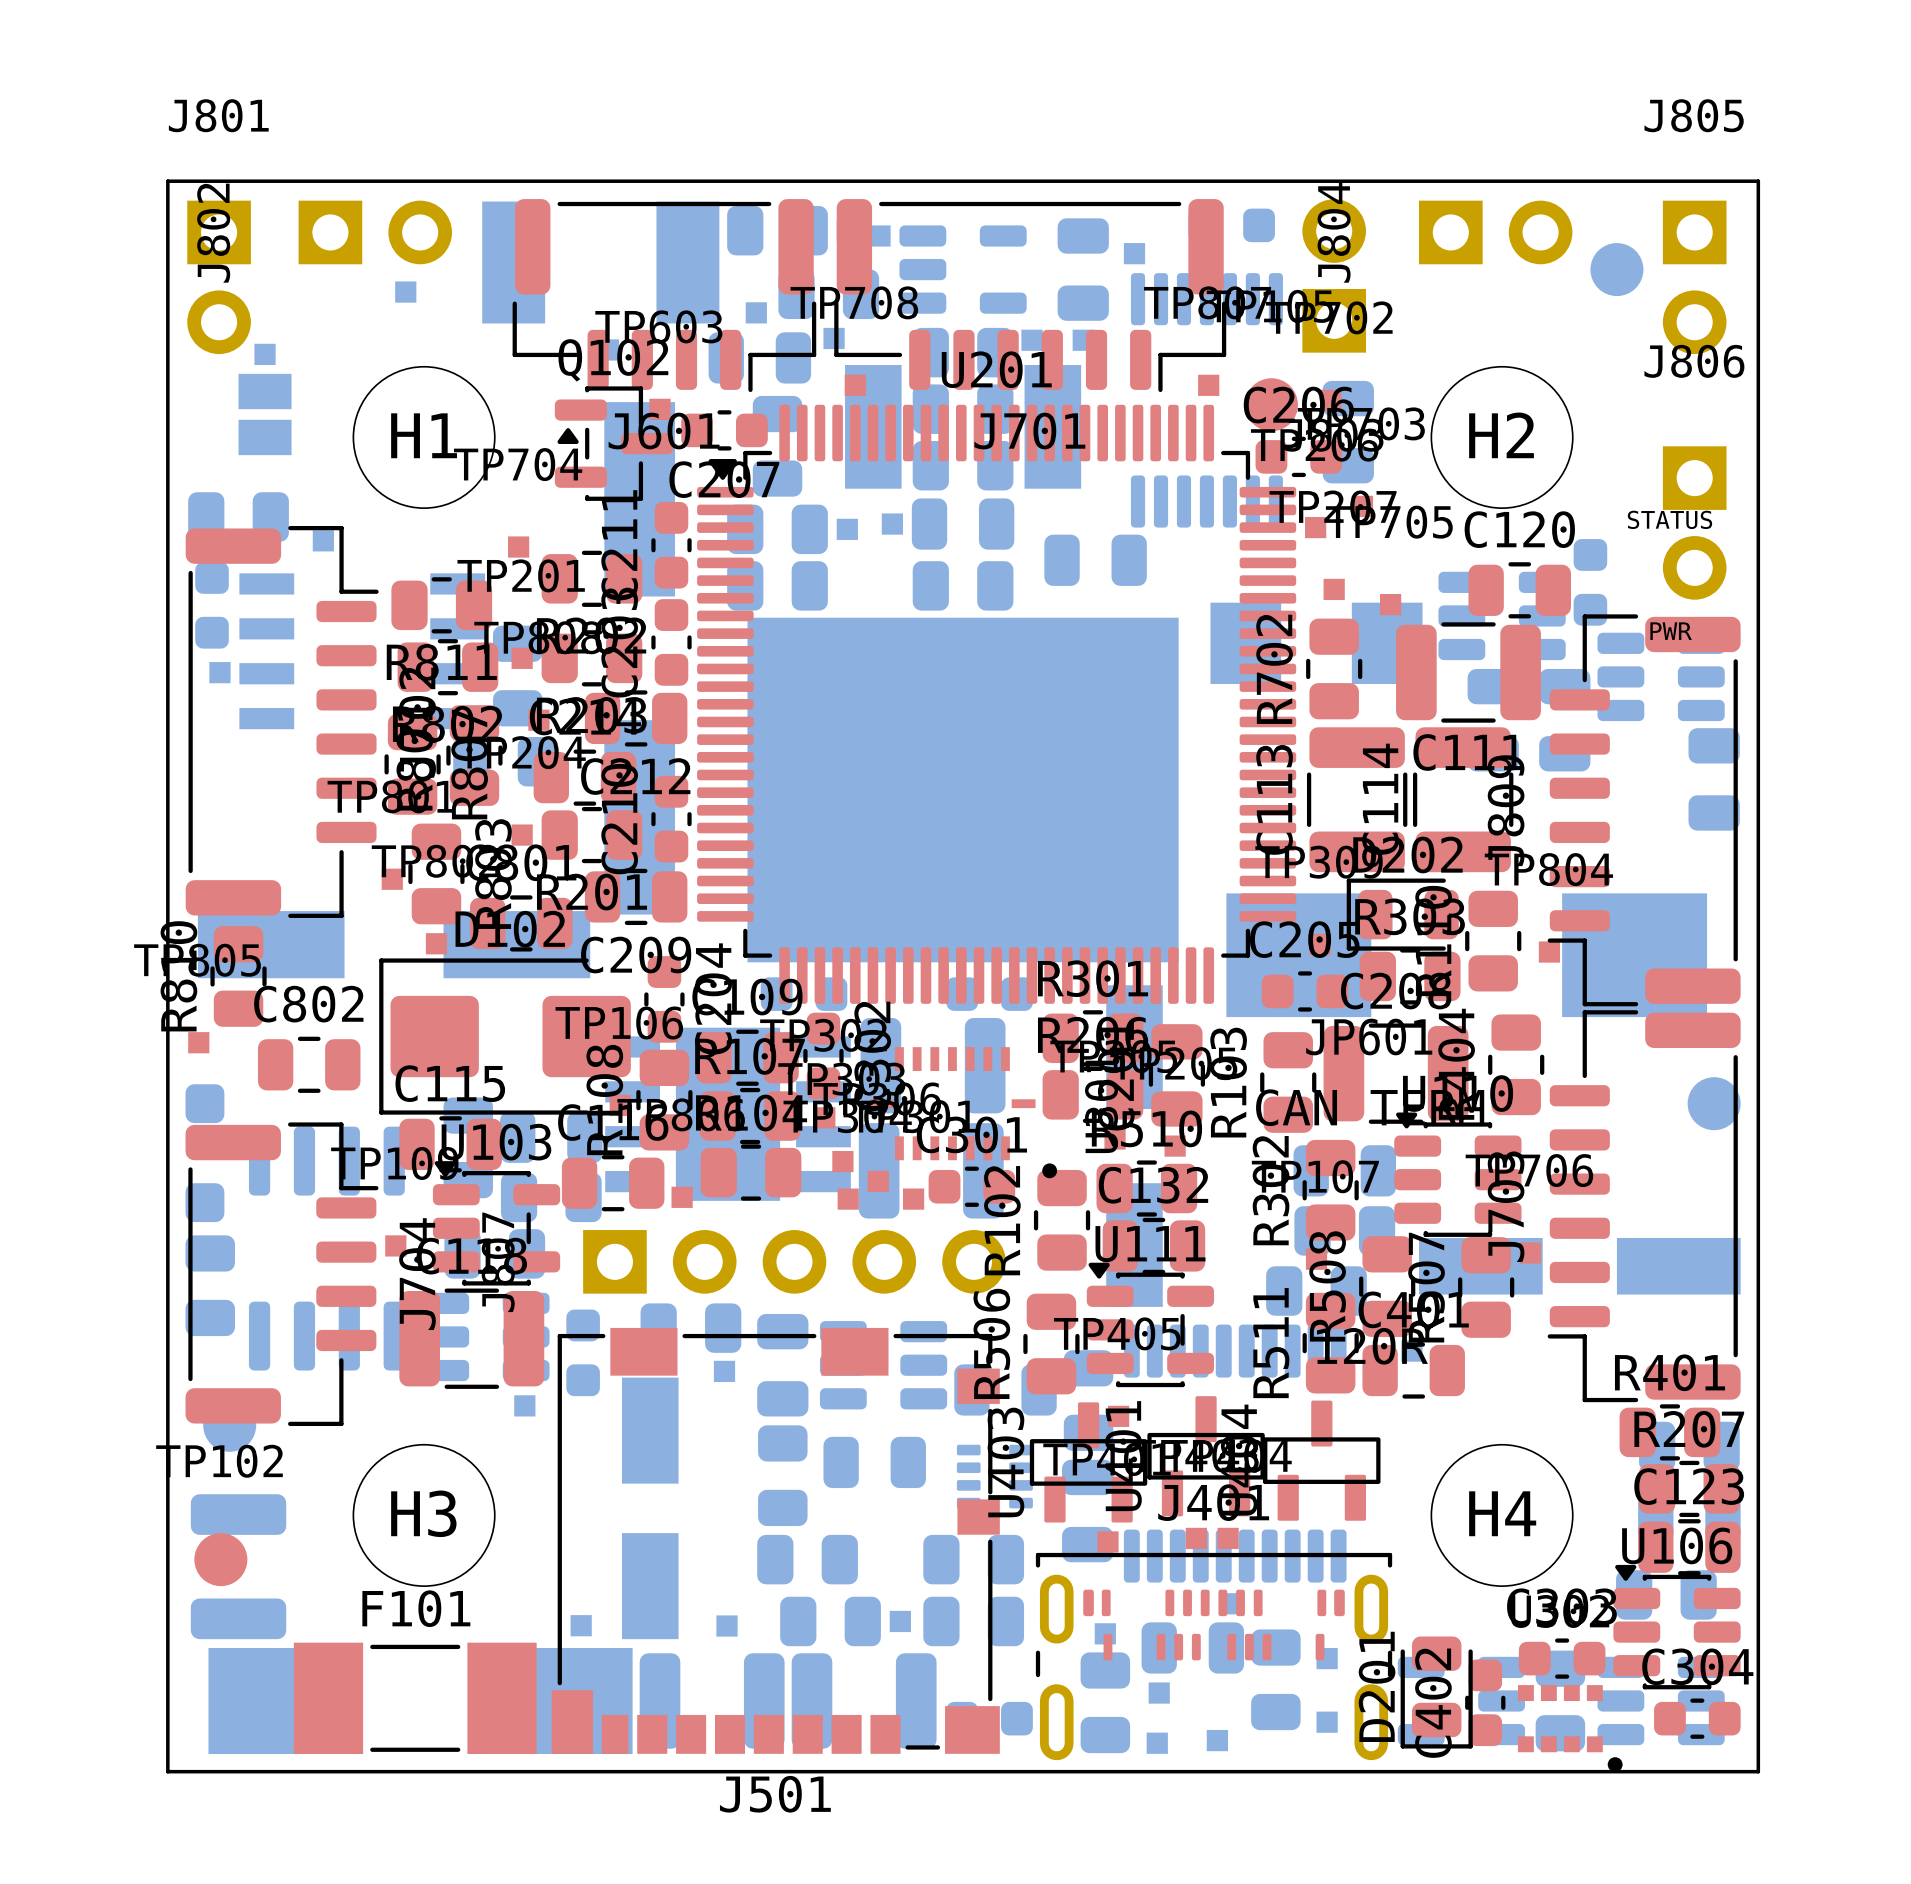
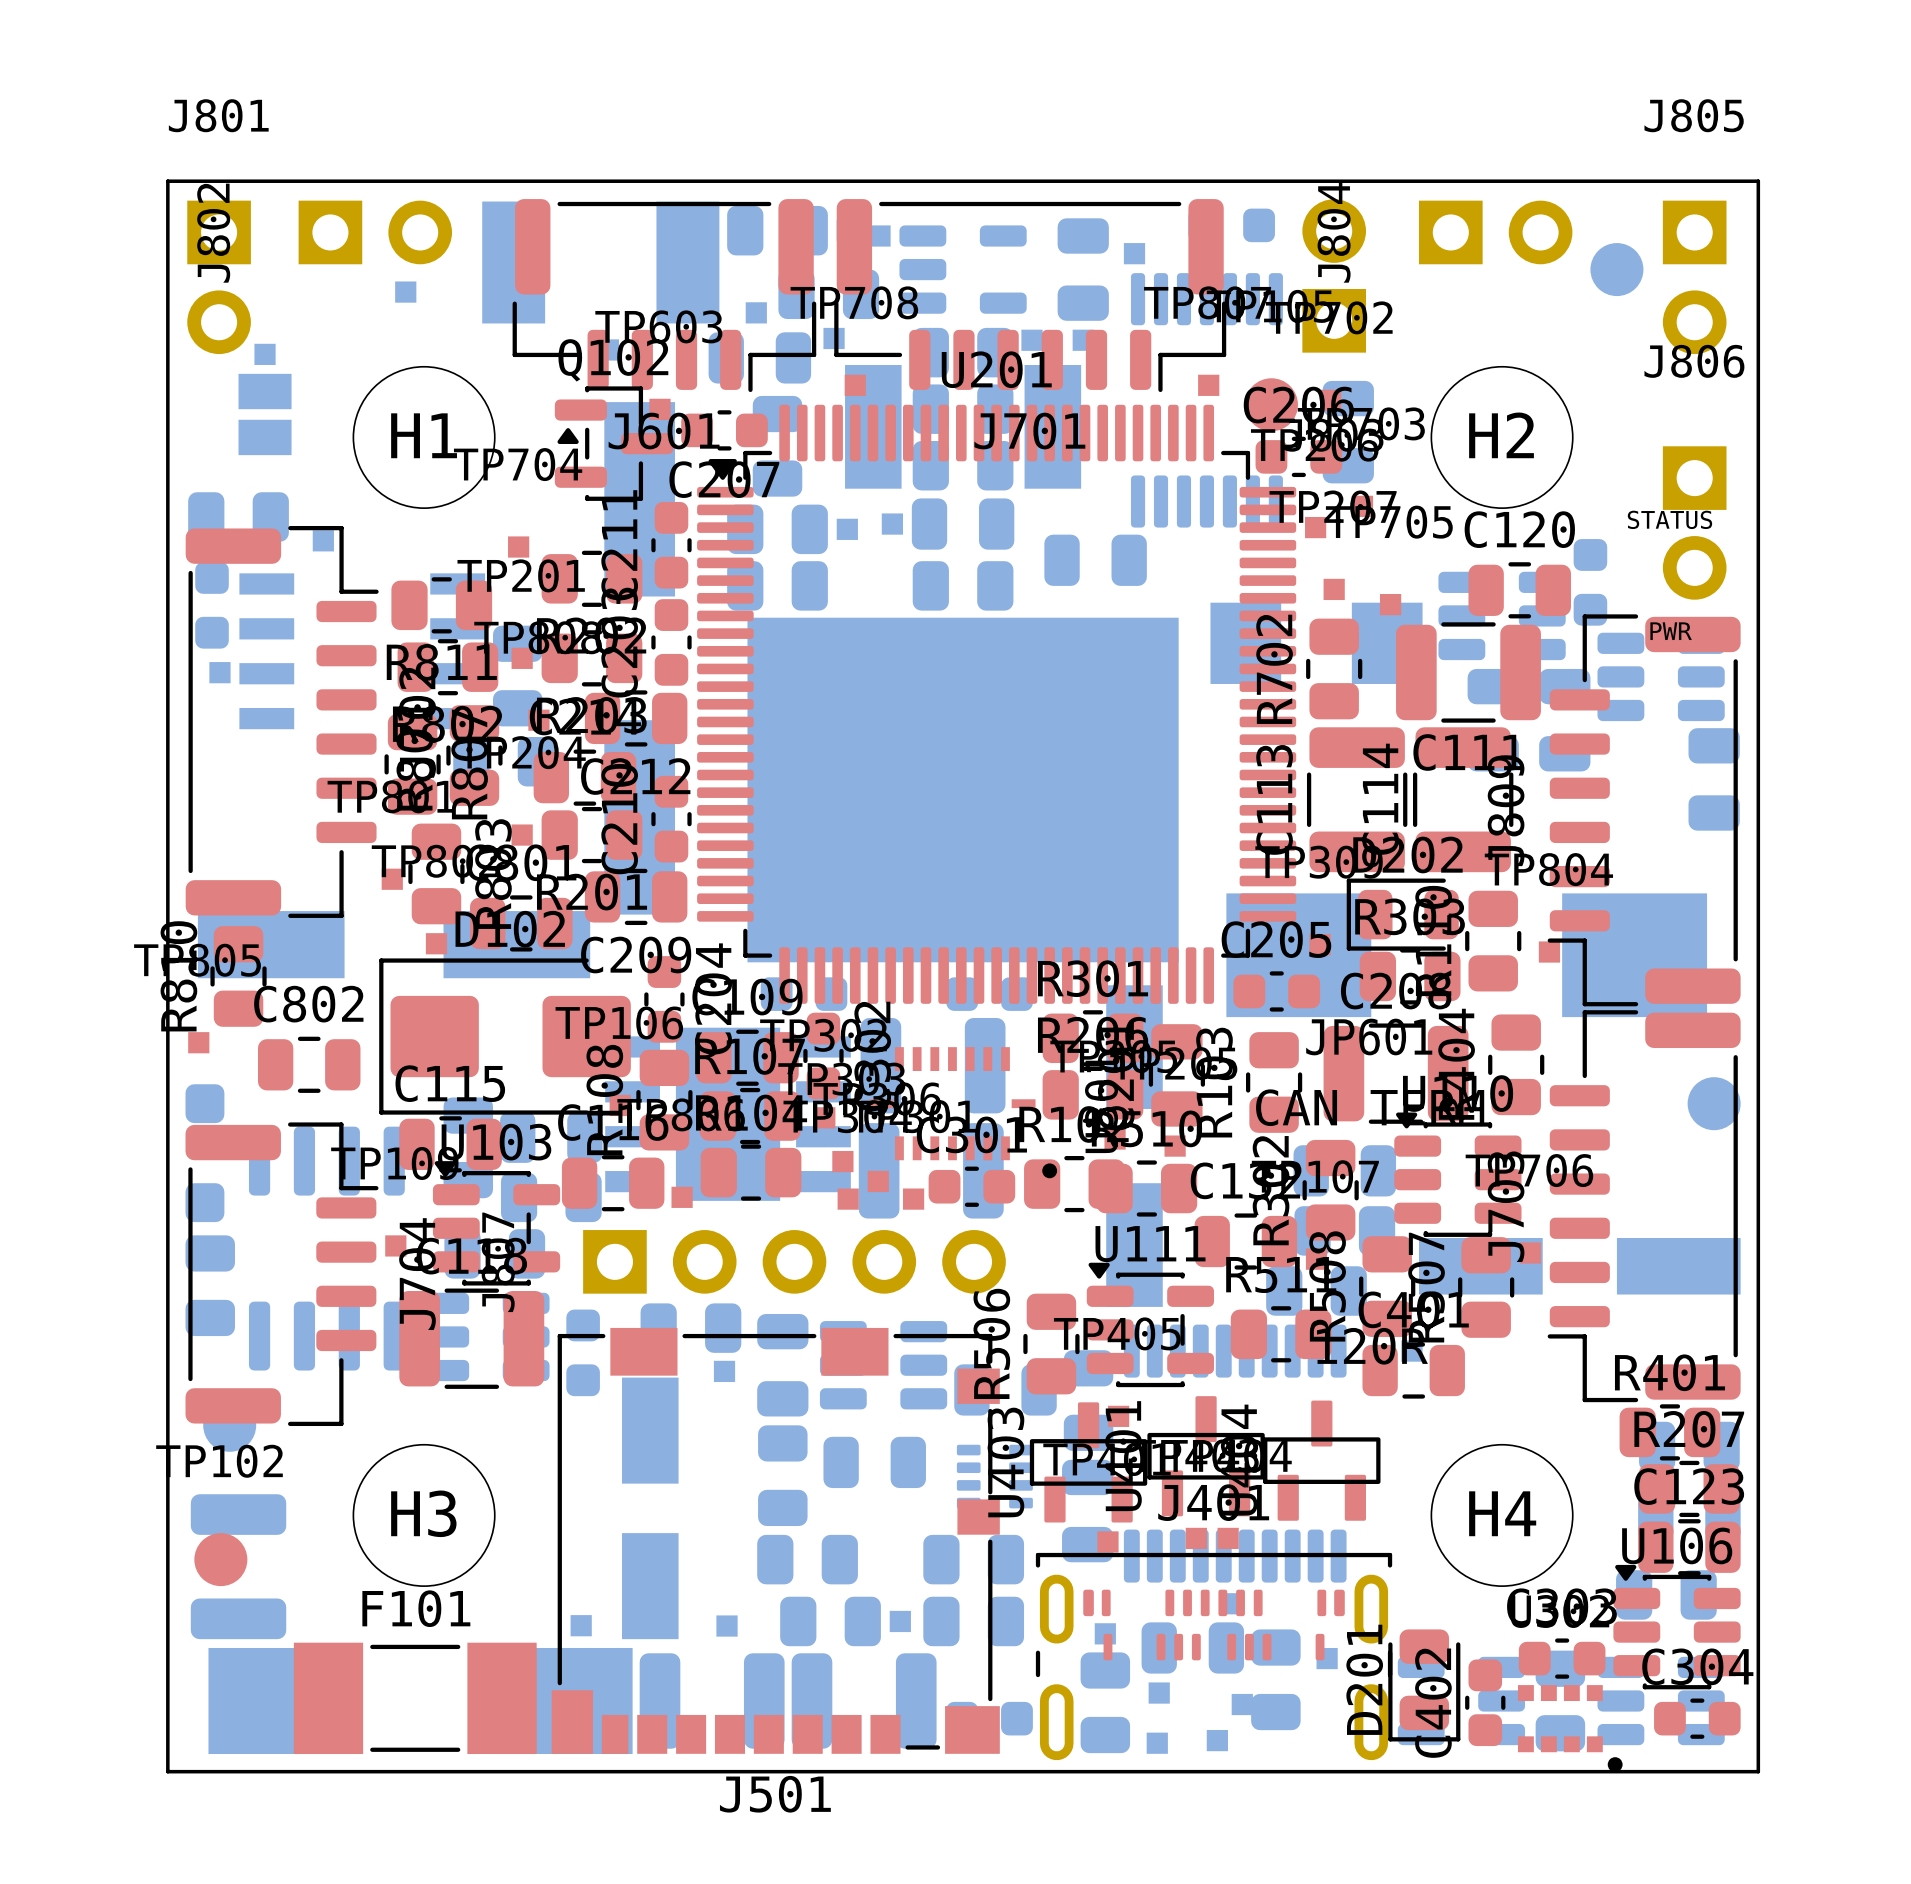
C205 position: (1305, 991) -> (1276, 991)
R103 position: (1288, 1082) -> (1274, 1082)
R102 rotation: 0° (1062, 1220) -> 90° clockwise (1074, 1184)
C132 position: (1153, 1245) -> (1245, 1241)
R511 rotation: 0° (1330, 1343) -> 90° clockwise (1281, 1334)
part: (524, 1405) -> none
D201 position: (1436, 1692) -> (1424, 1685)
part position: (1327, 1722) -> (1242, 1704)

